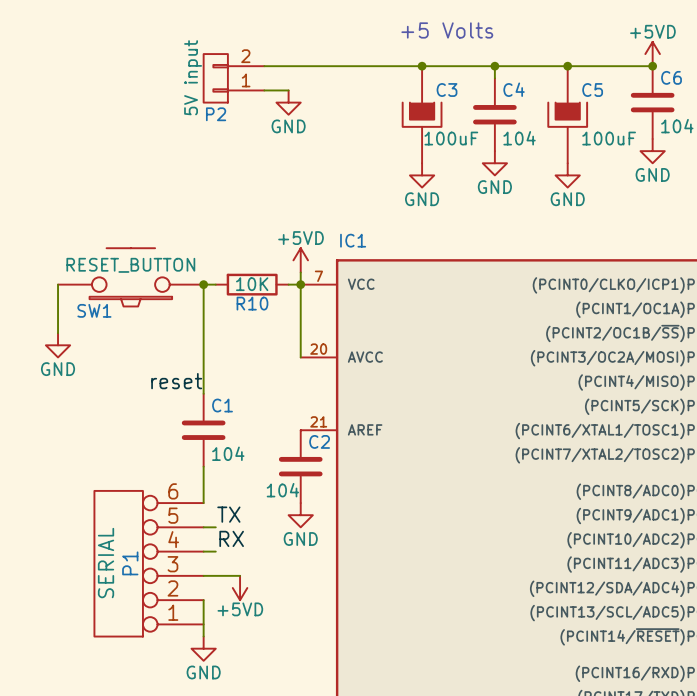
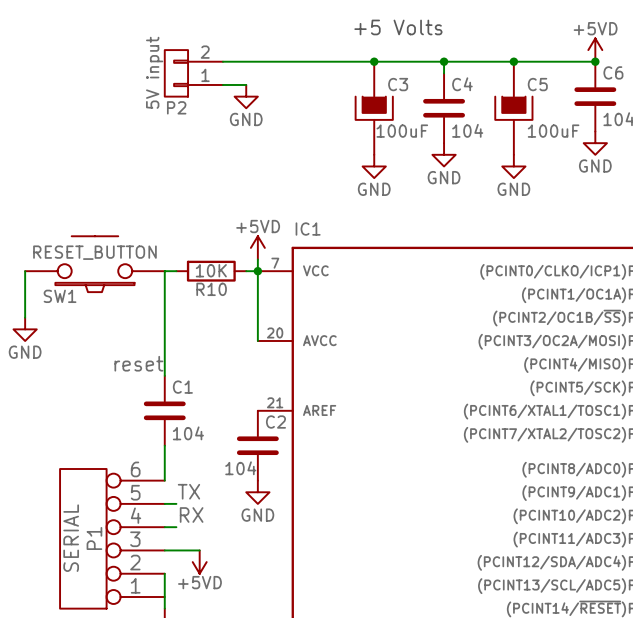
junction: (203, 284) -> none

